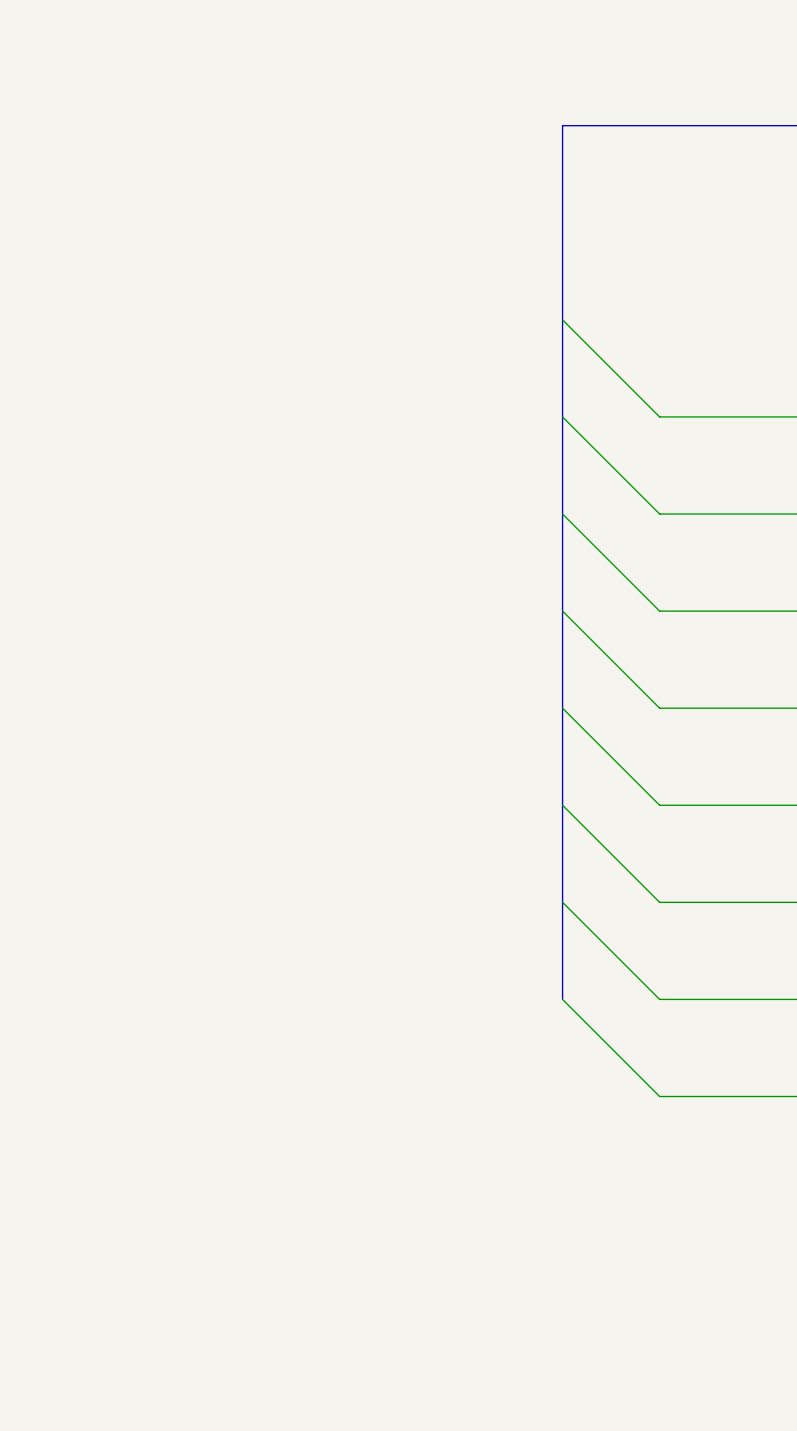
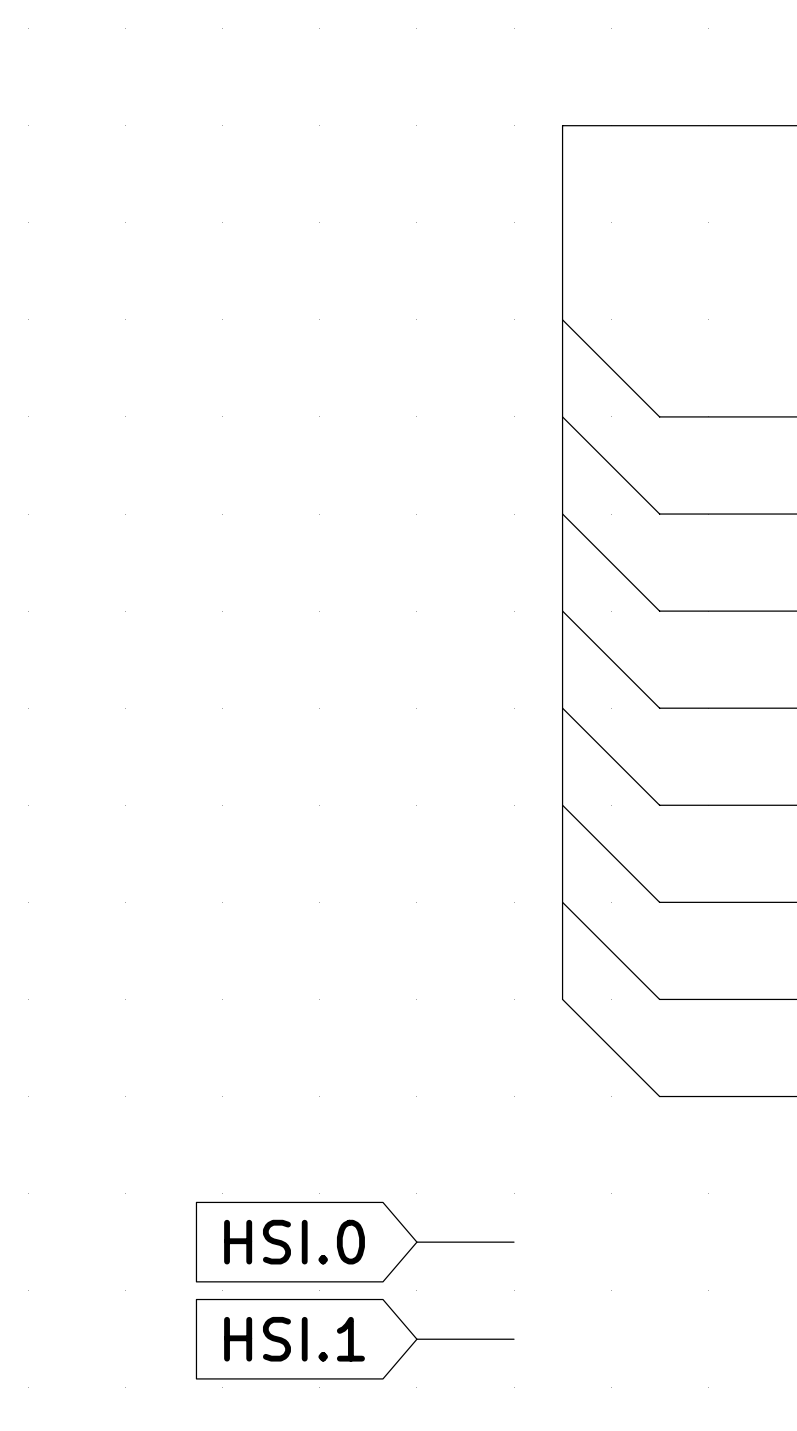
global label: none -> HSI.0 (294, 1242)
wire: none -> (416, 1242) (514, 1242)
global label: none -> HSI.1 (294, 1339)
wire: none -> (416, 1339) (514, 1339)

